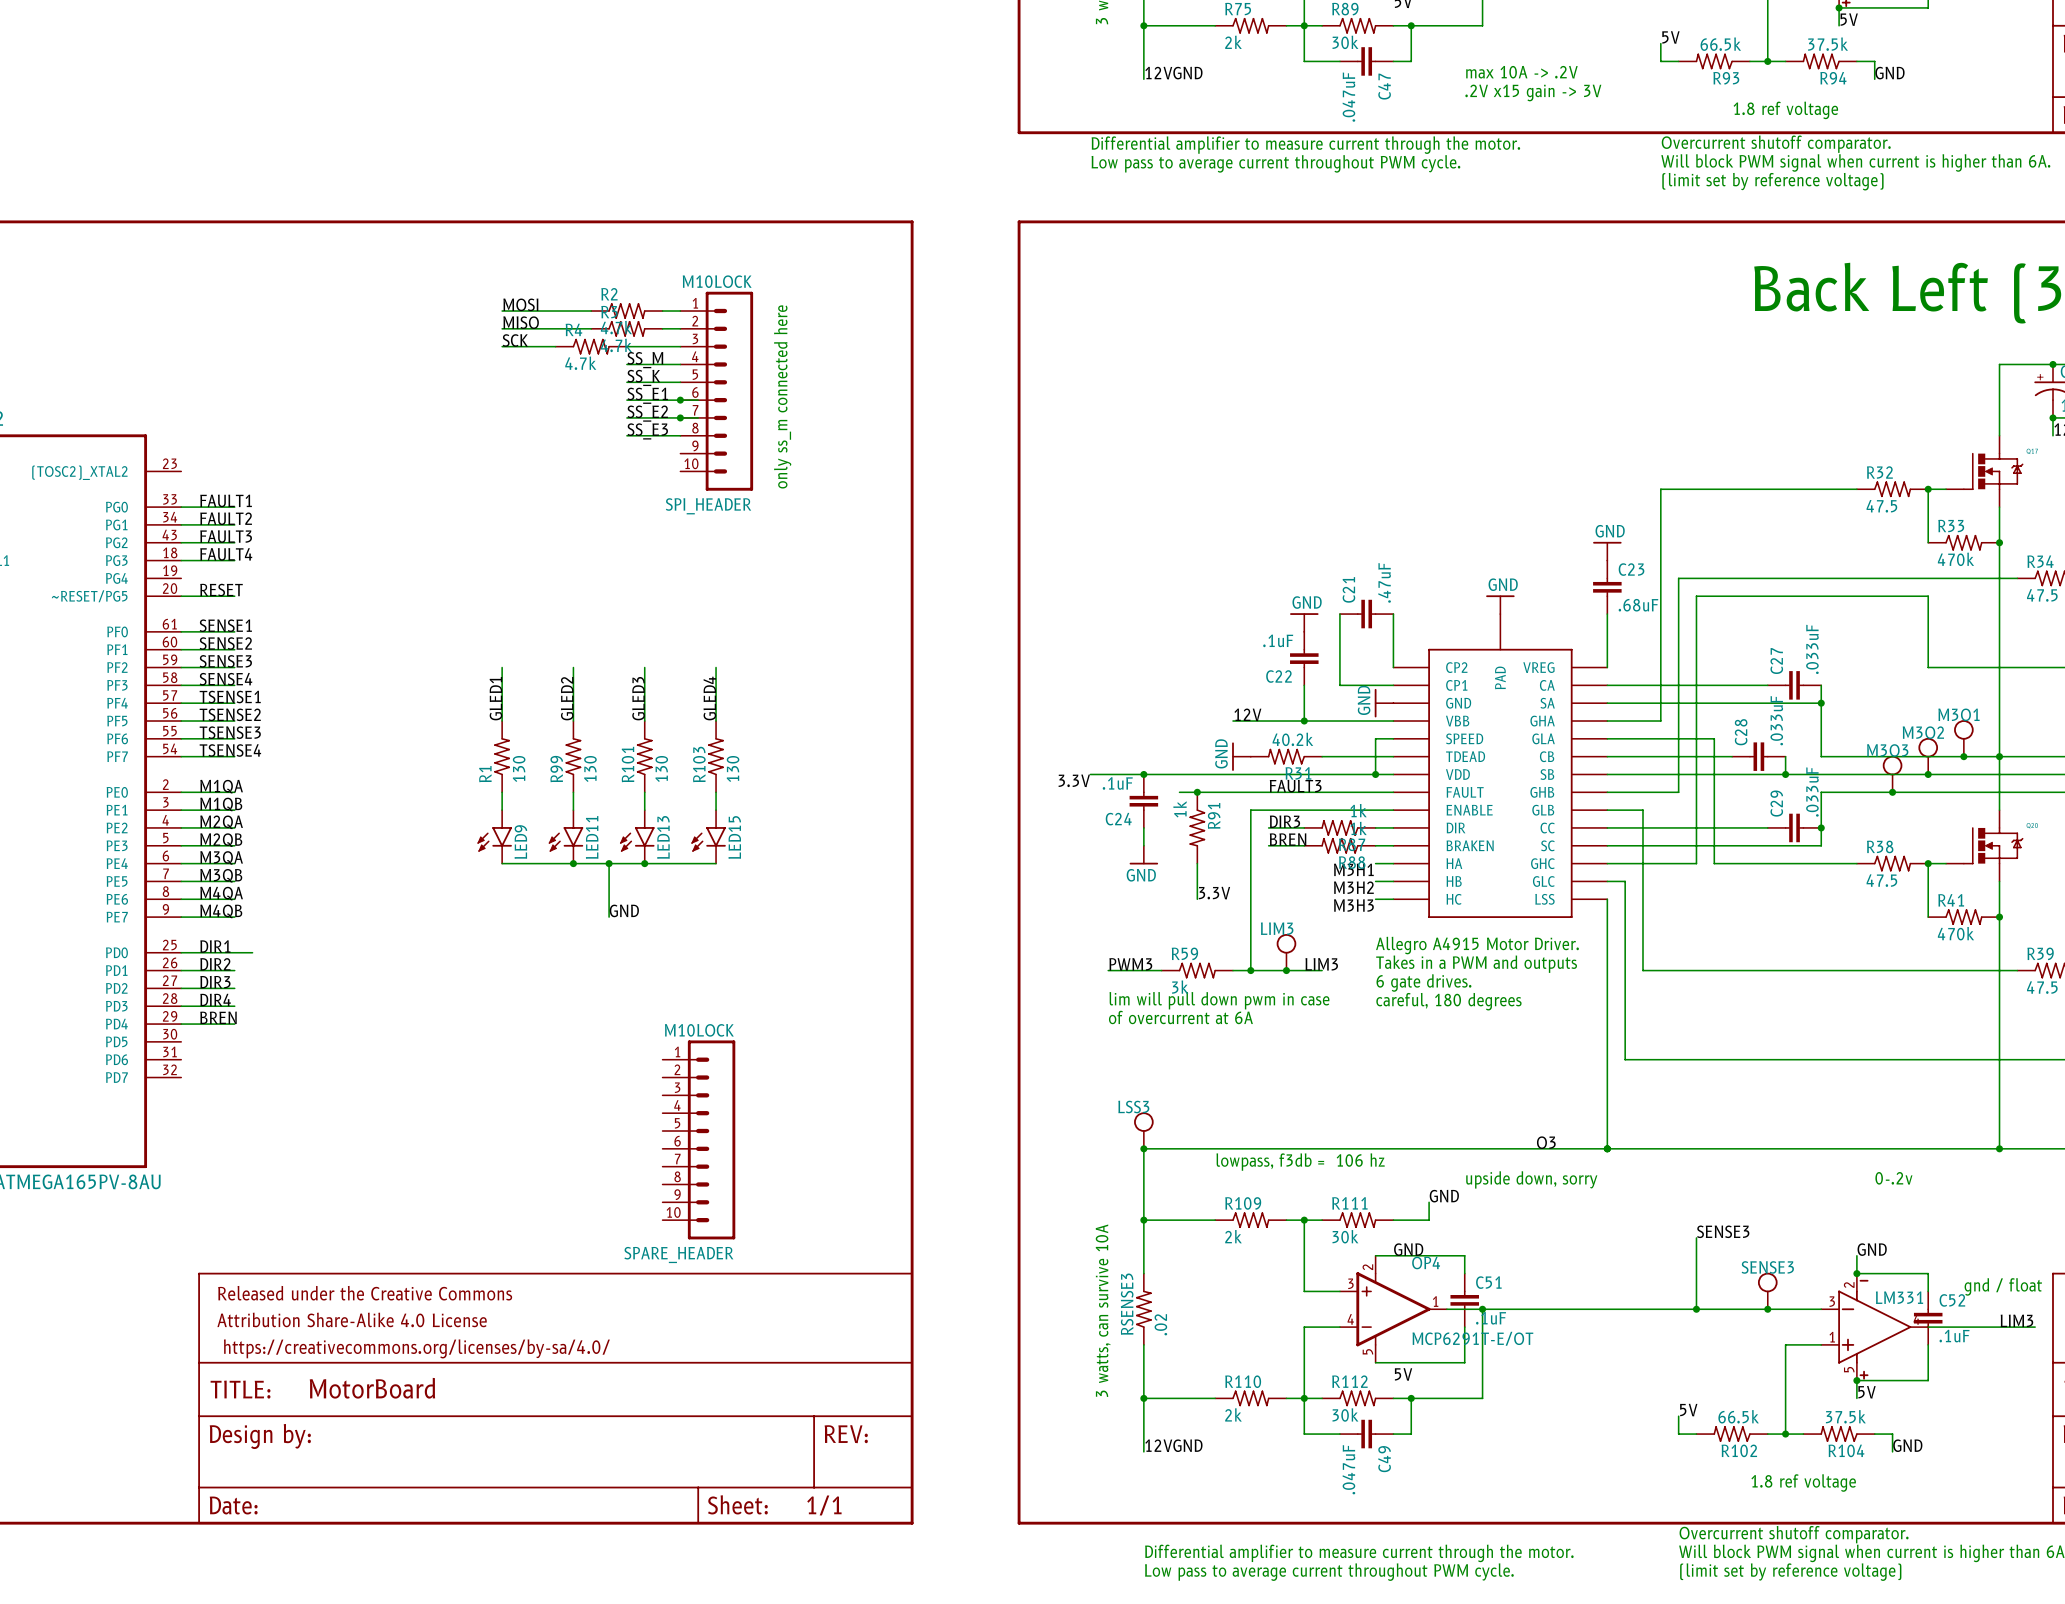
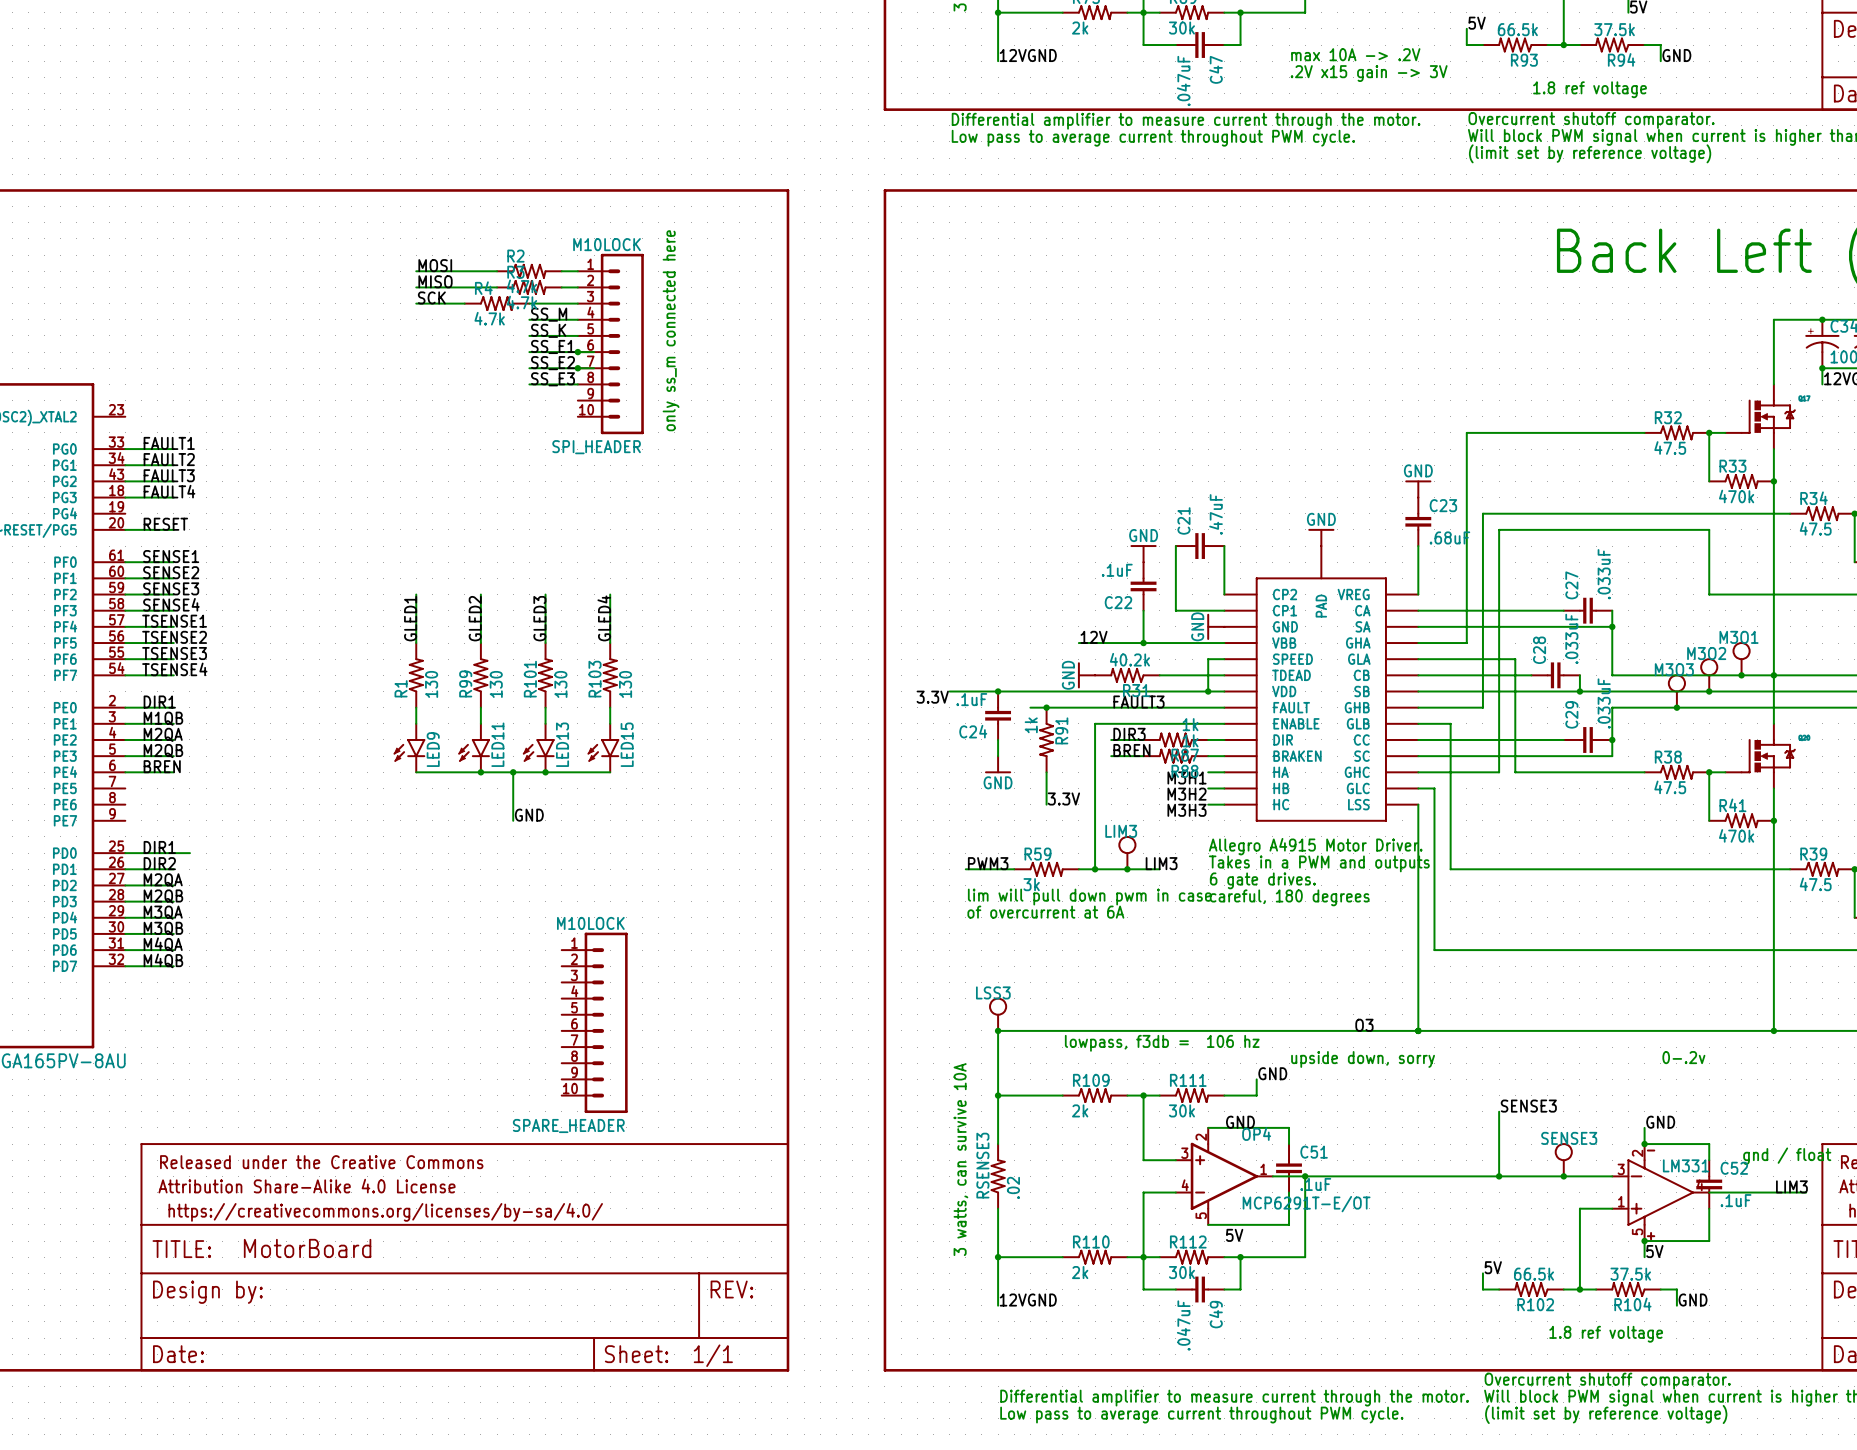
label: M1QA (221, 786) -> DIR1 (159, 702)
label: M3QA (221, 857) -> BREN (162, 766)
label position: M3QB (221, 875) -> M3QB (163, 928)
wire: (181, 881) (234, 881) -> (125, 933) (173, 933)
label position: M4QA (221, 893) -> M4QA (163, 944)
wire: (181, 899) (234, 899) -> (125, 950) (173, 950)
label position: M4QB (221, 911) -> M4QB (163, 960)
wire: (181, 917) (234, 917) -> (125, 966) (173, 966)
label: DIR3 (215, 982) -> M2QA (163, 880)
label: DIR4 (215, 999) -> M2QB (163, 896)
label: BREN (218, 1017) -> M3QA (163, 912)

